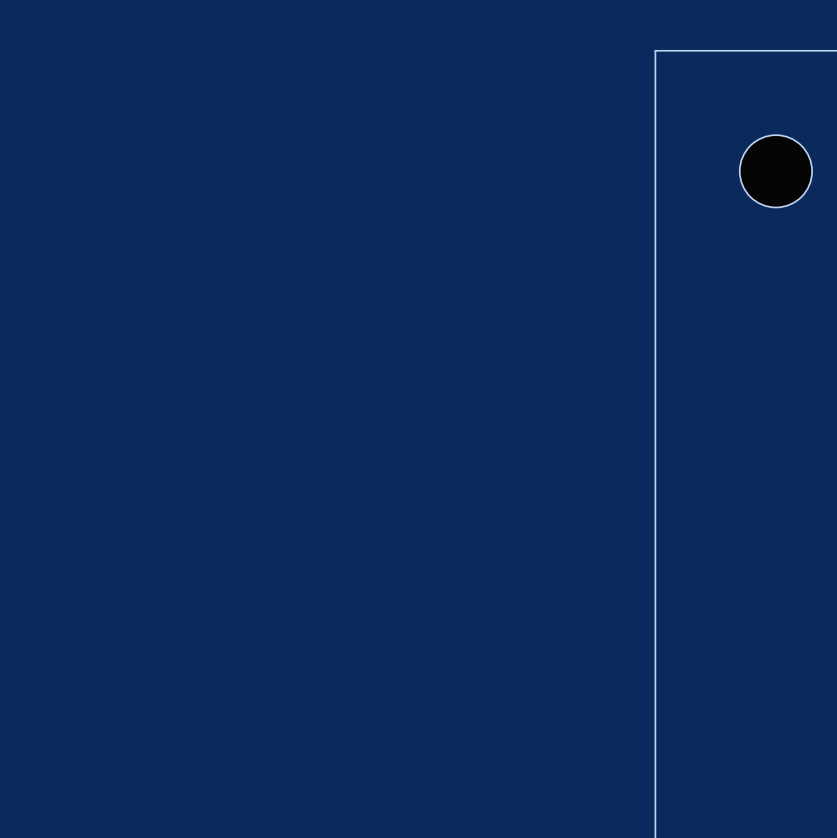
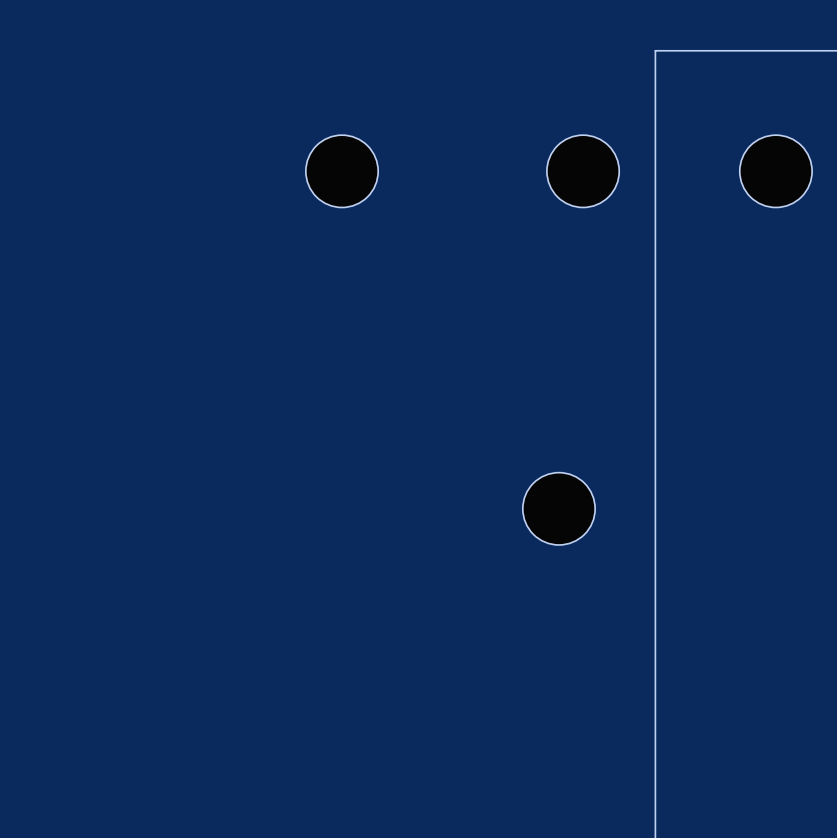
hole: none -> (342, 171)
hole: none -> (583, 171)
hole: none -> (558, 508)

